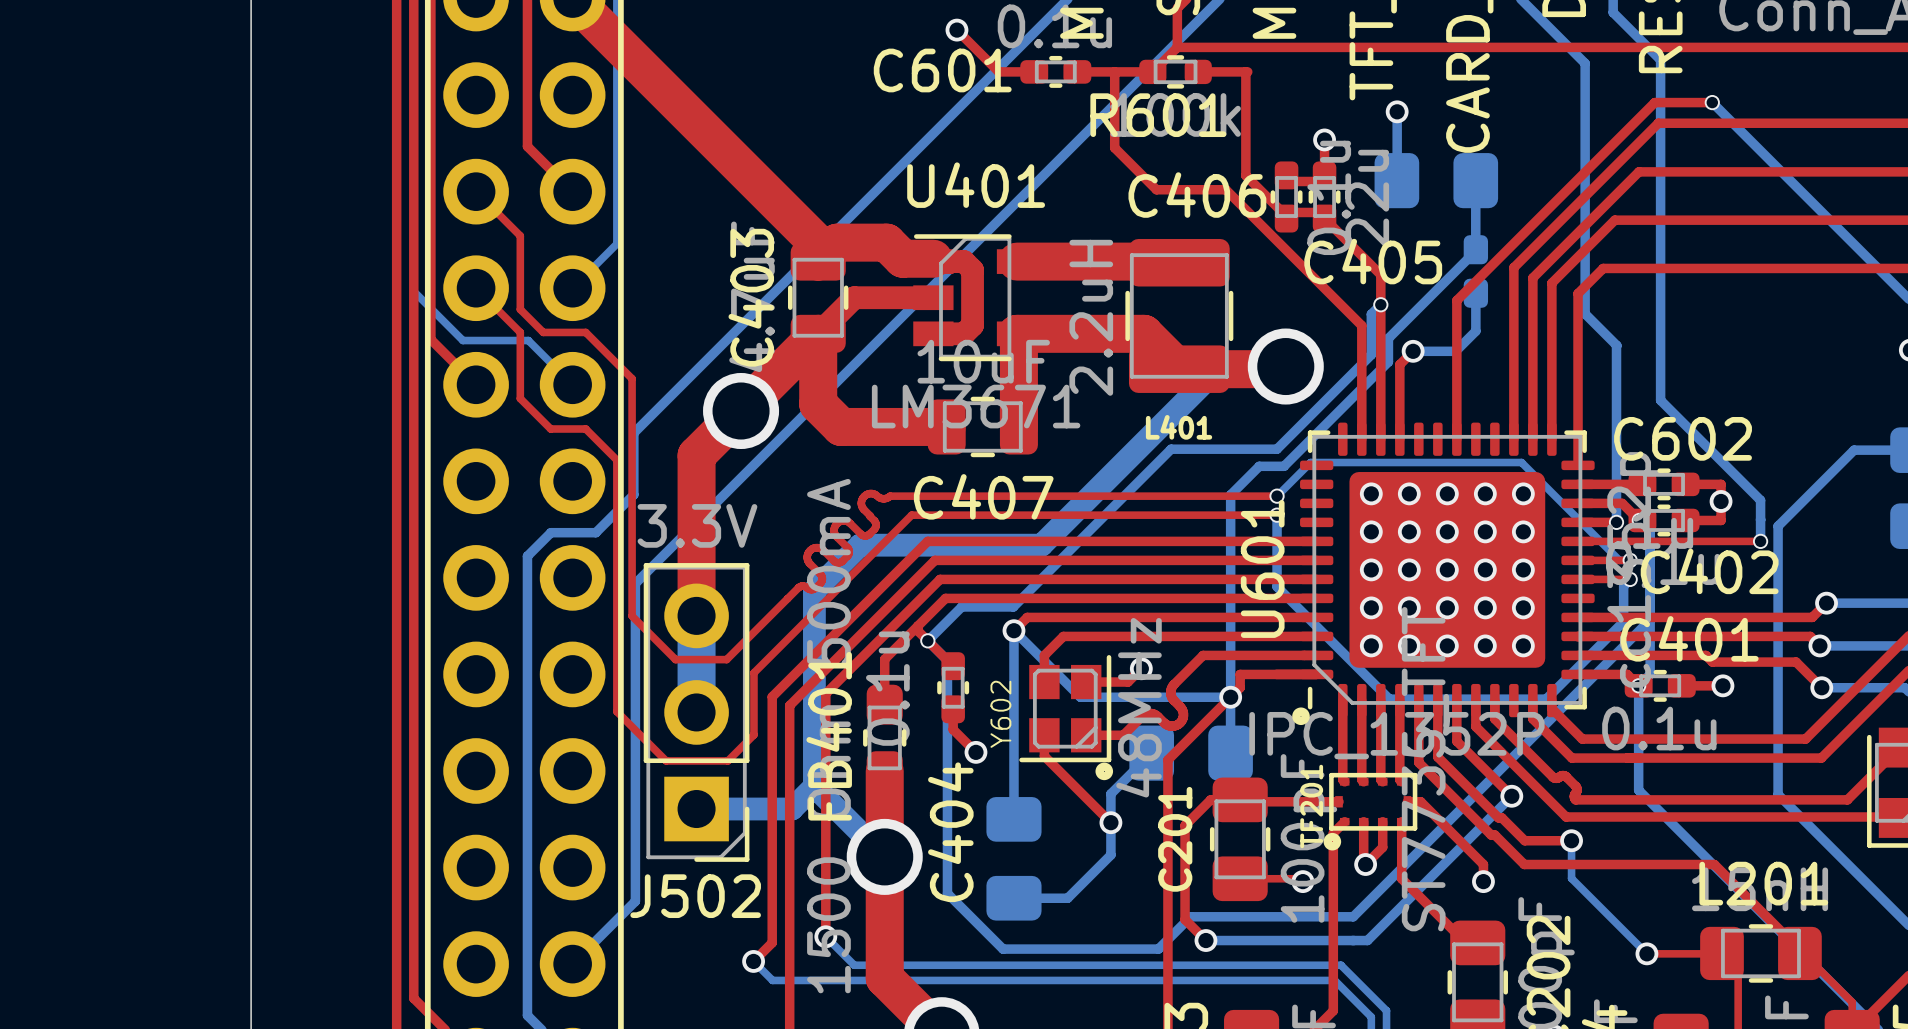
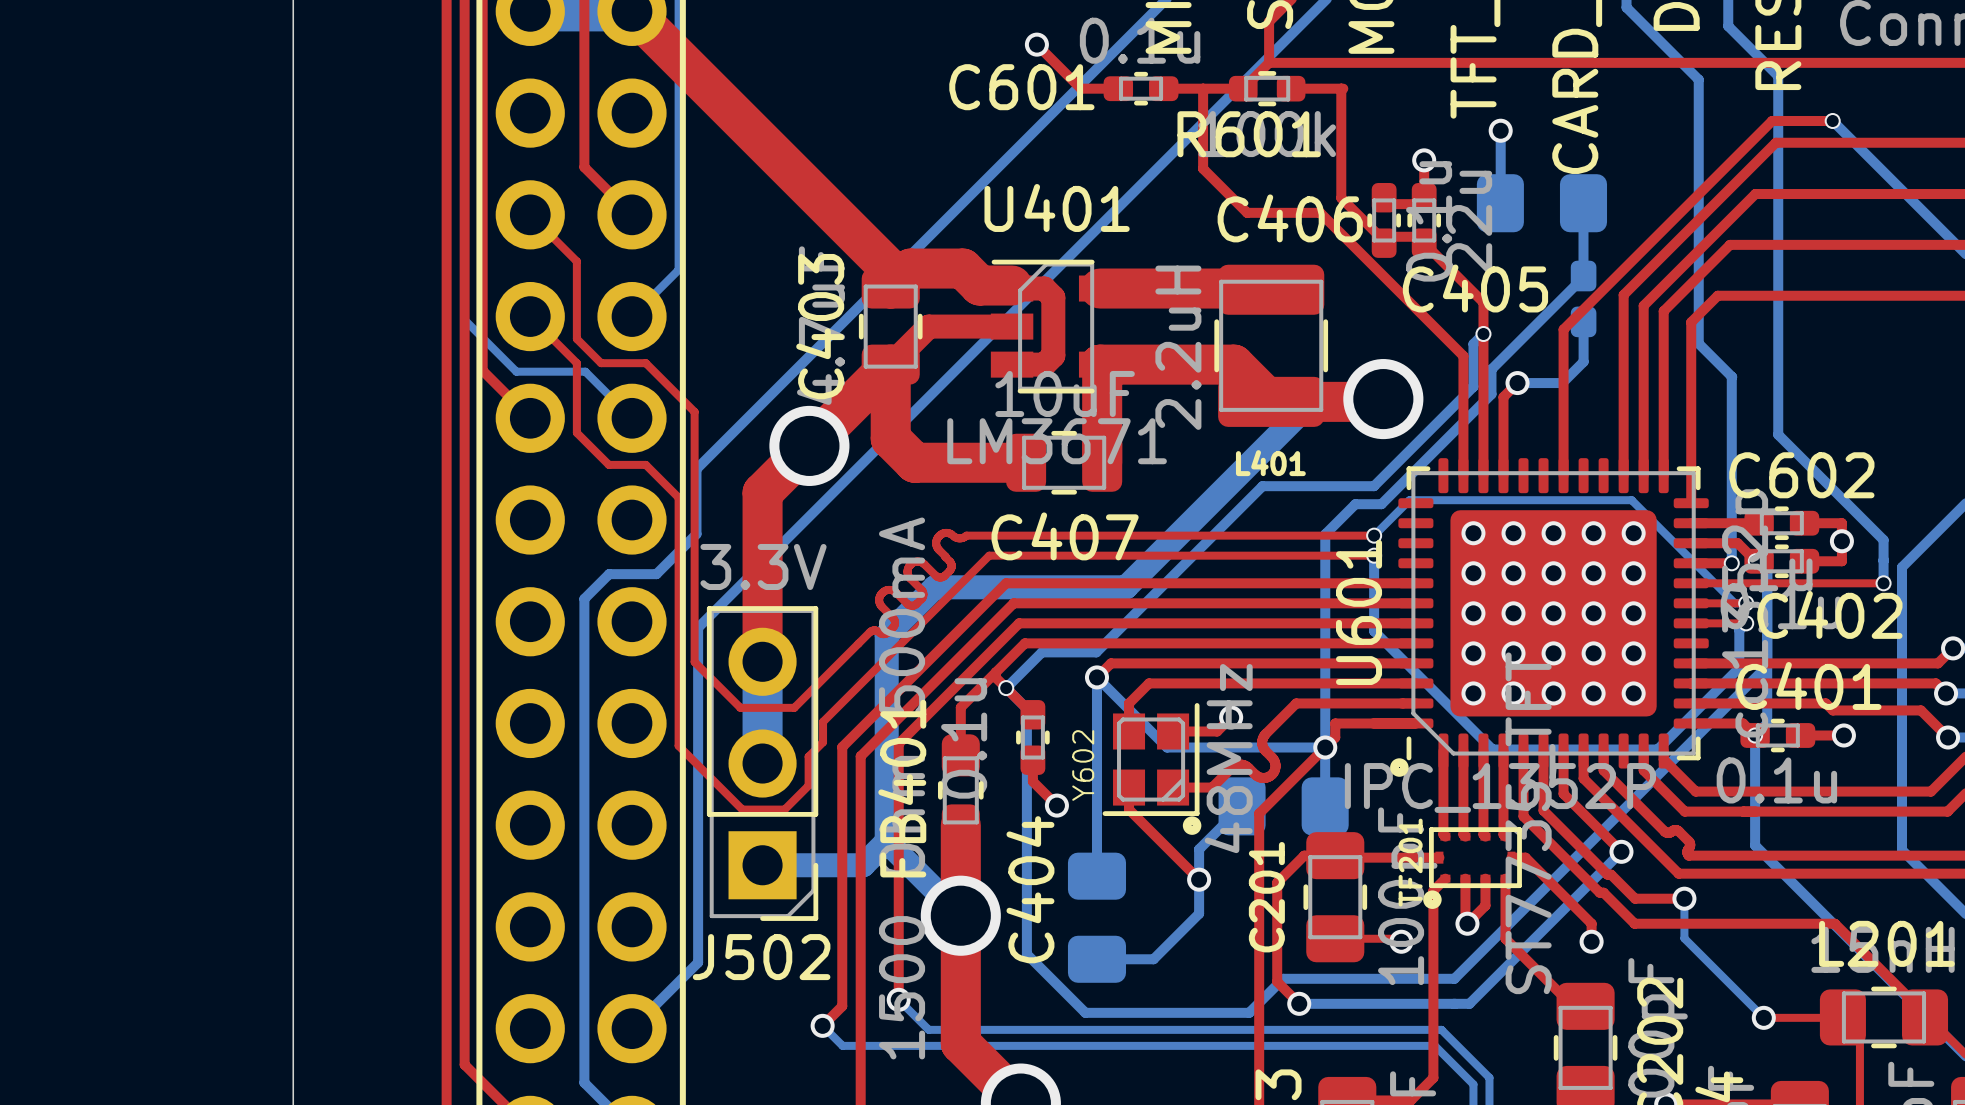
top track: (753, 692) (753, 734) (727, 760) (666, 760) (616, 711) (616, 695) -> (823, 742) (808, 756) (808, 785) (784, 809) (742, 809) (678, 745)

